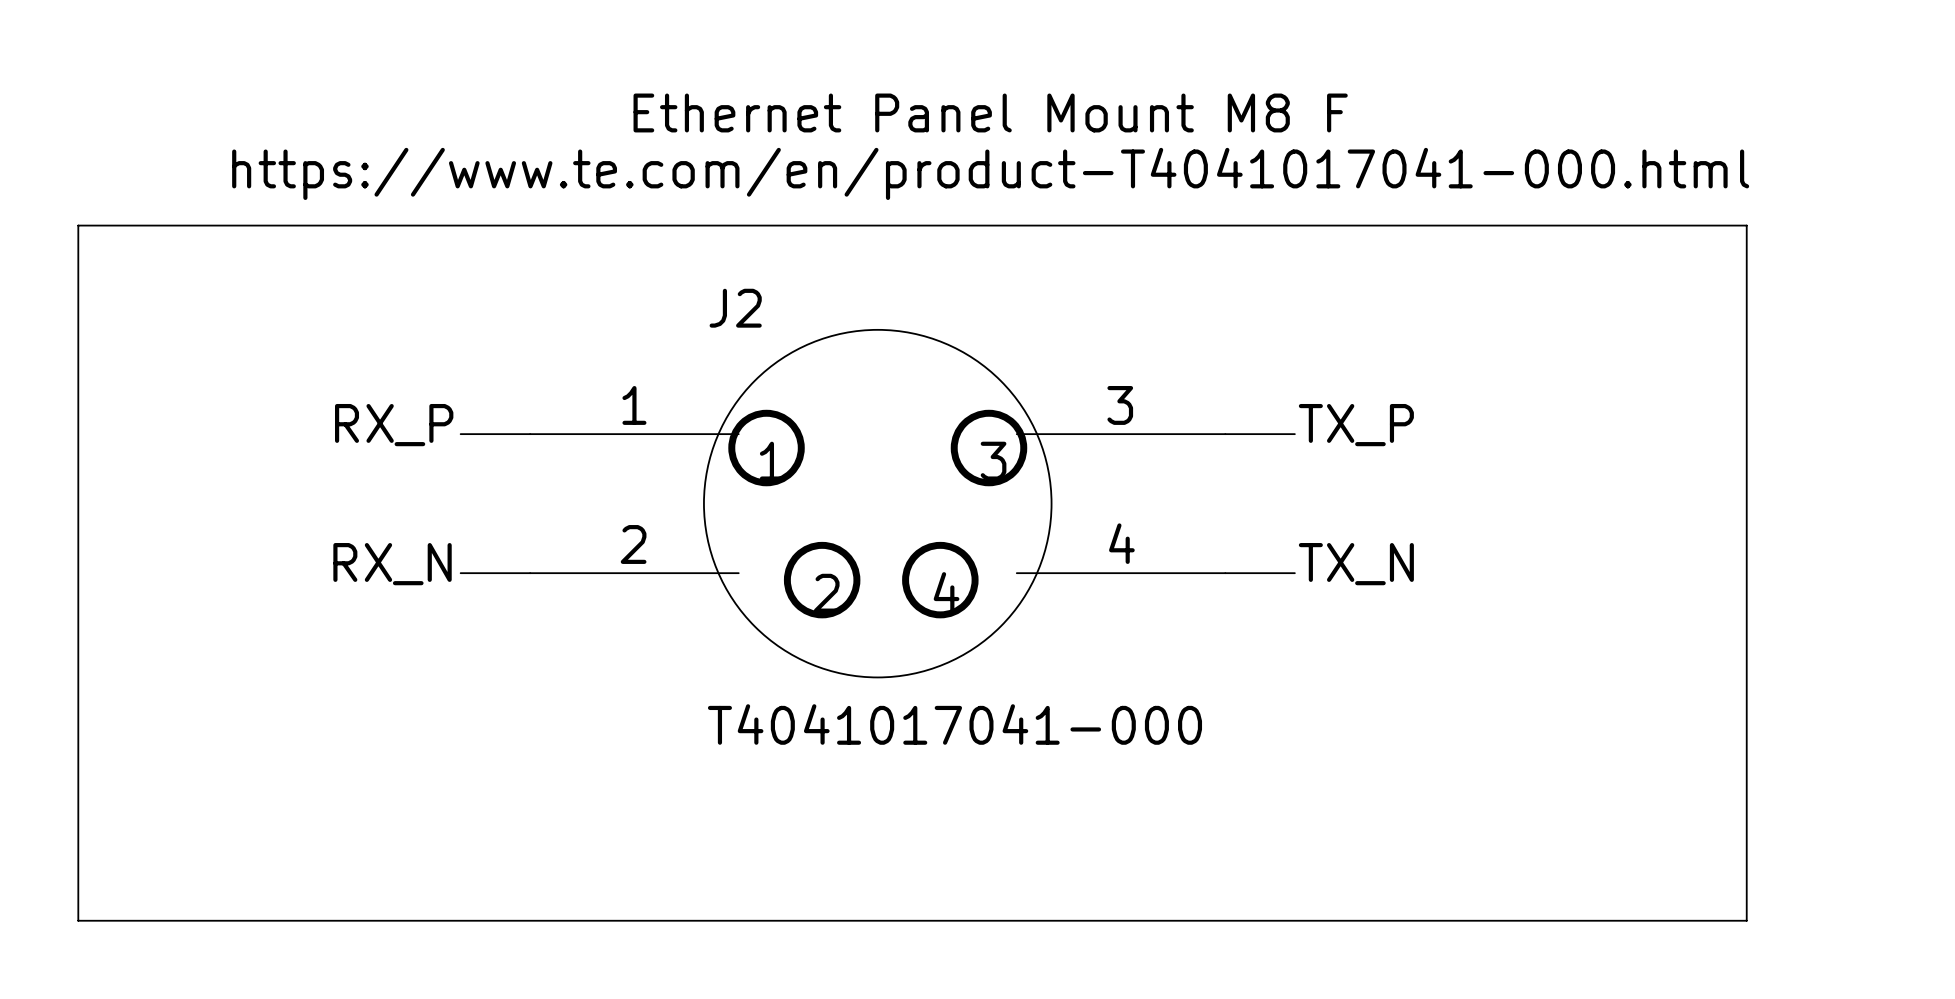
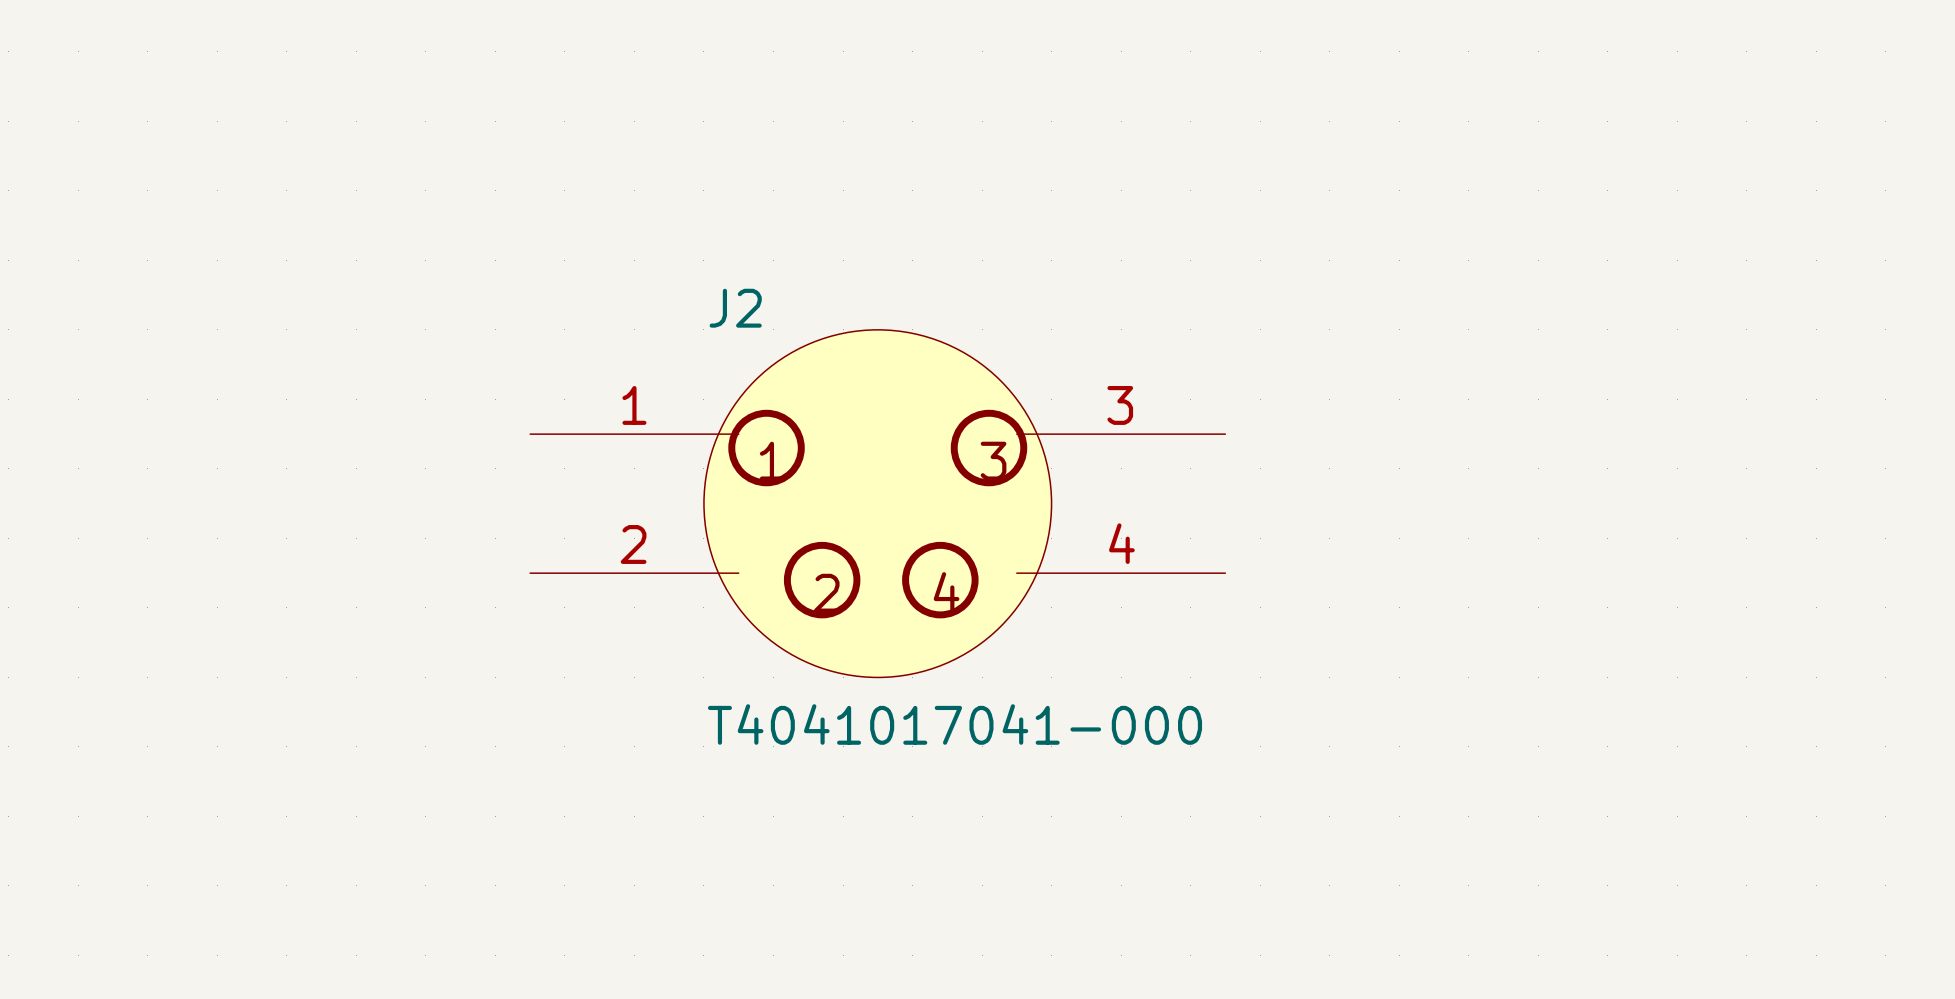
text: Ethernet Panel Mount M8 F (990, 112) -> none
text: https://www.te.com/en/product-T4041017041-000.html (990, 173) -> none
line: (78, 225) (1746, 225) (1746, 920) (78, 920) (78, 225) -> none
label: RX_P (394, 425) -> none
label: TX_P (1356, 425) -> none
wire: (460, 434) (530, 434) -> none
wire: (1225, 434) (1294, 434) -> none
label: RX_N (392, 564) -> none
label: TX_N (1356, 564) -> none
wire: (460, 573) (530, 573) -> none
wire: (1225, 573) (1294, 573) -> none

